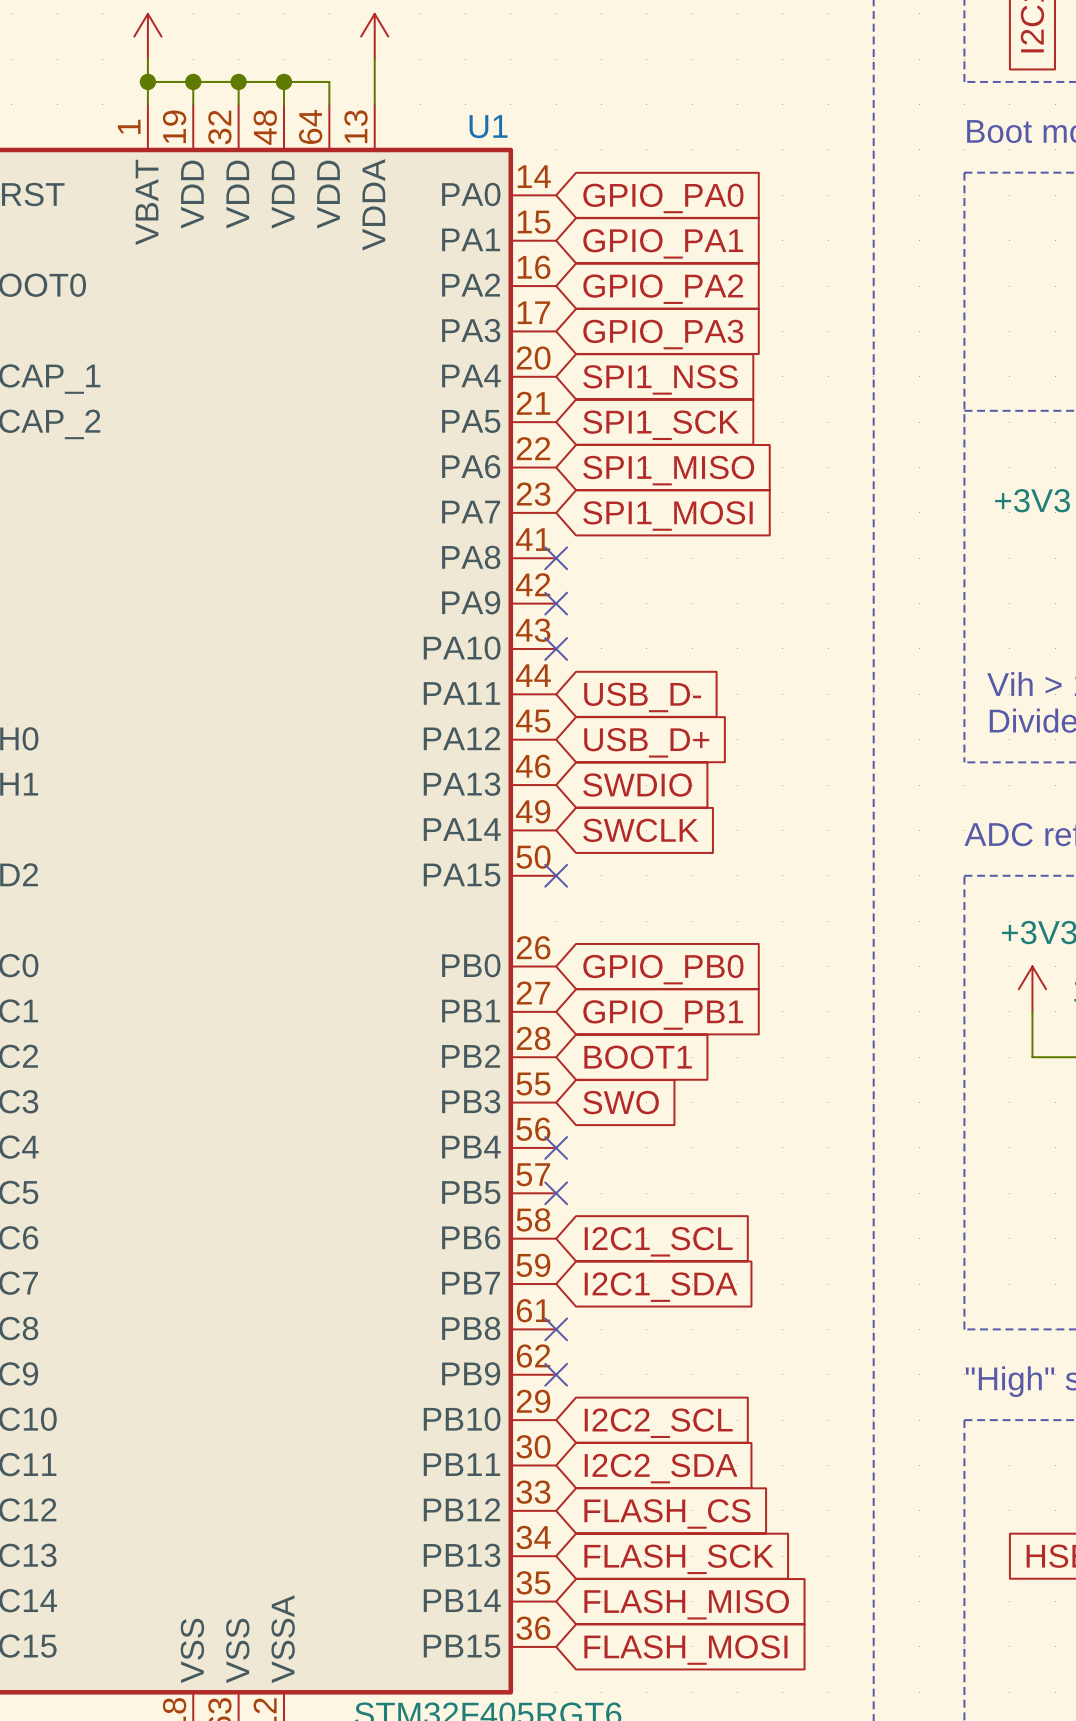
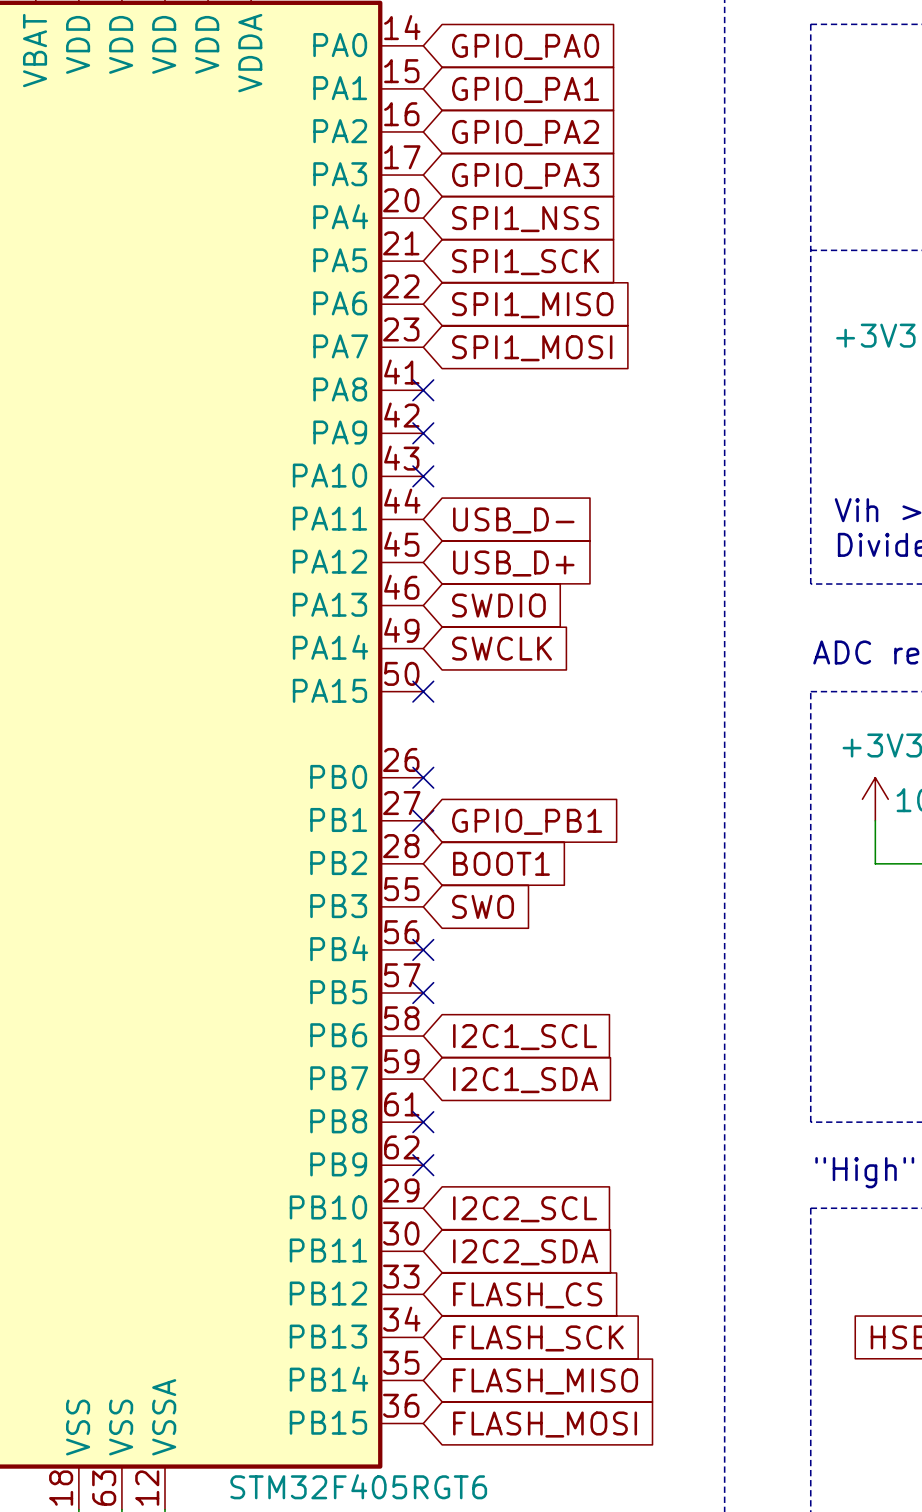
no-connect mark: none -> (423, 777)
global label: GPIO_PB0 (663, 969) -> none
no-connect mark: none -> (423, 820)

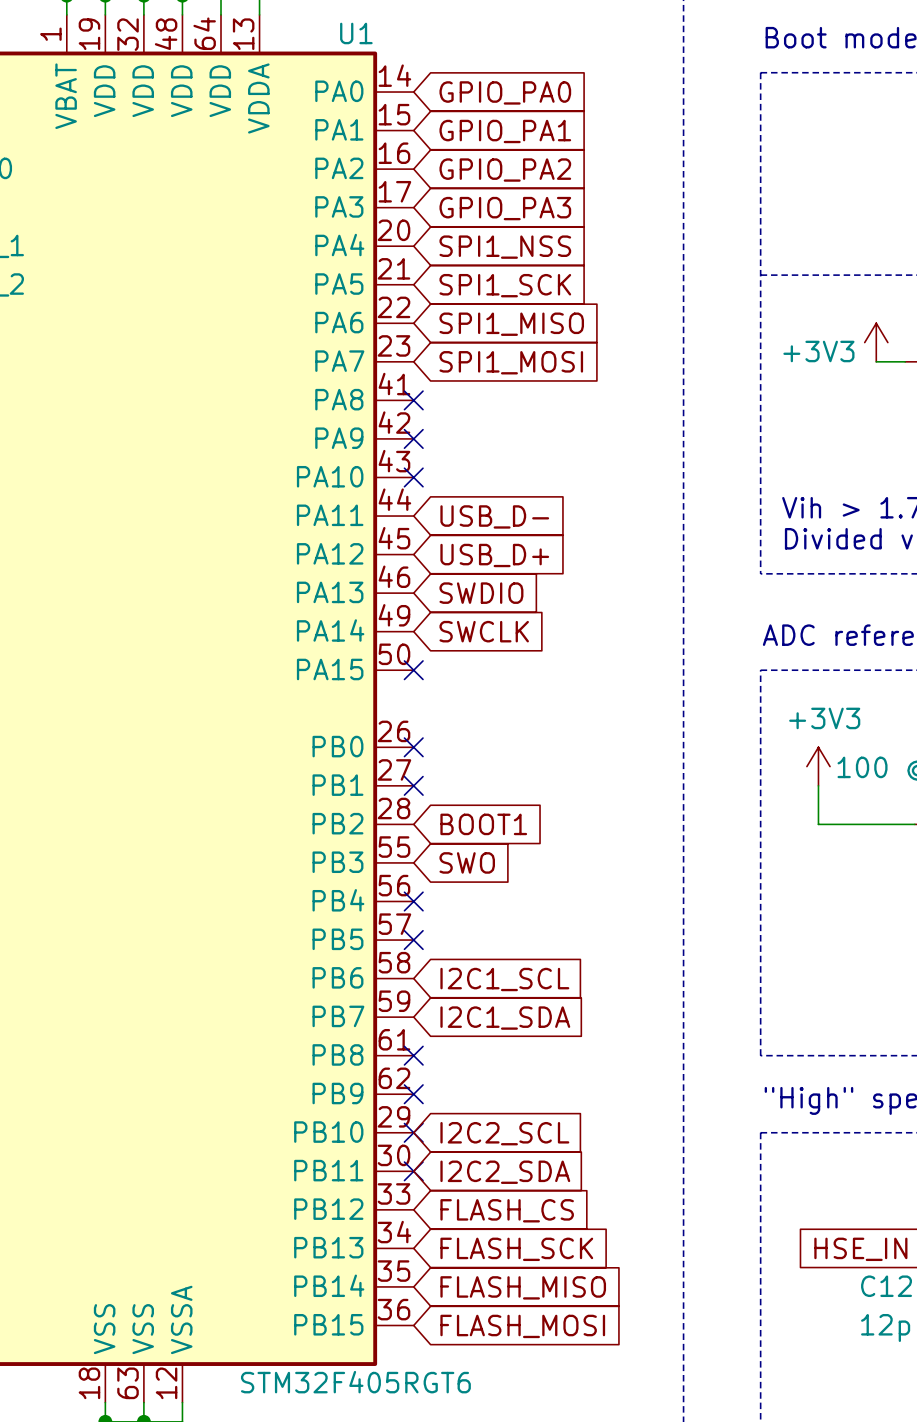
global label: GPIO_PB1 (527, 821) -> none
no-connect mark: none -> (413, 1132)
no-connect mark: none -> (413, 1171)

